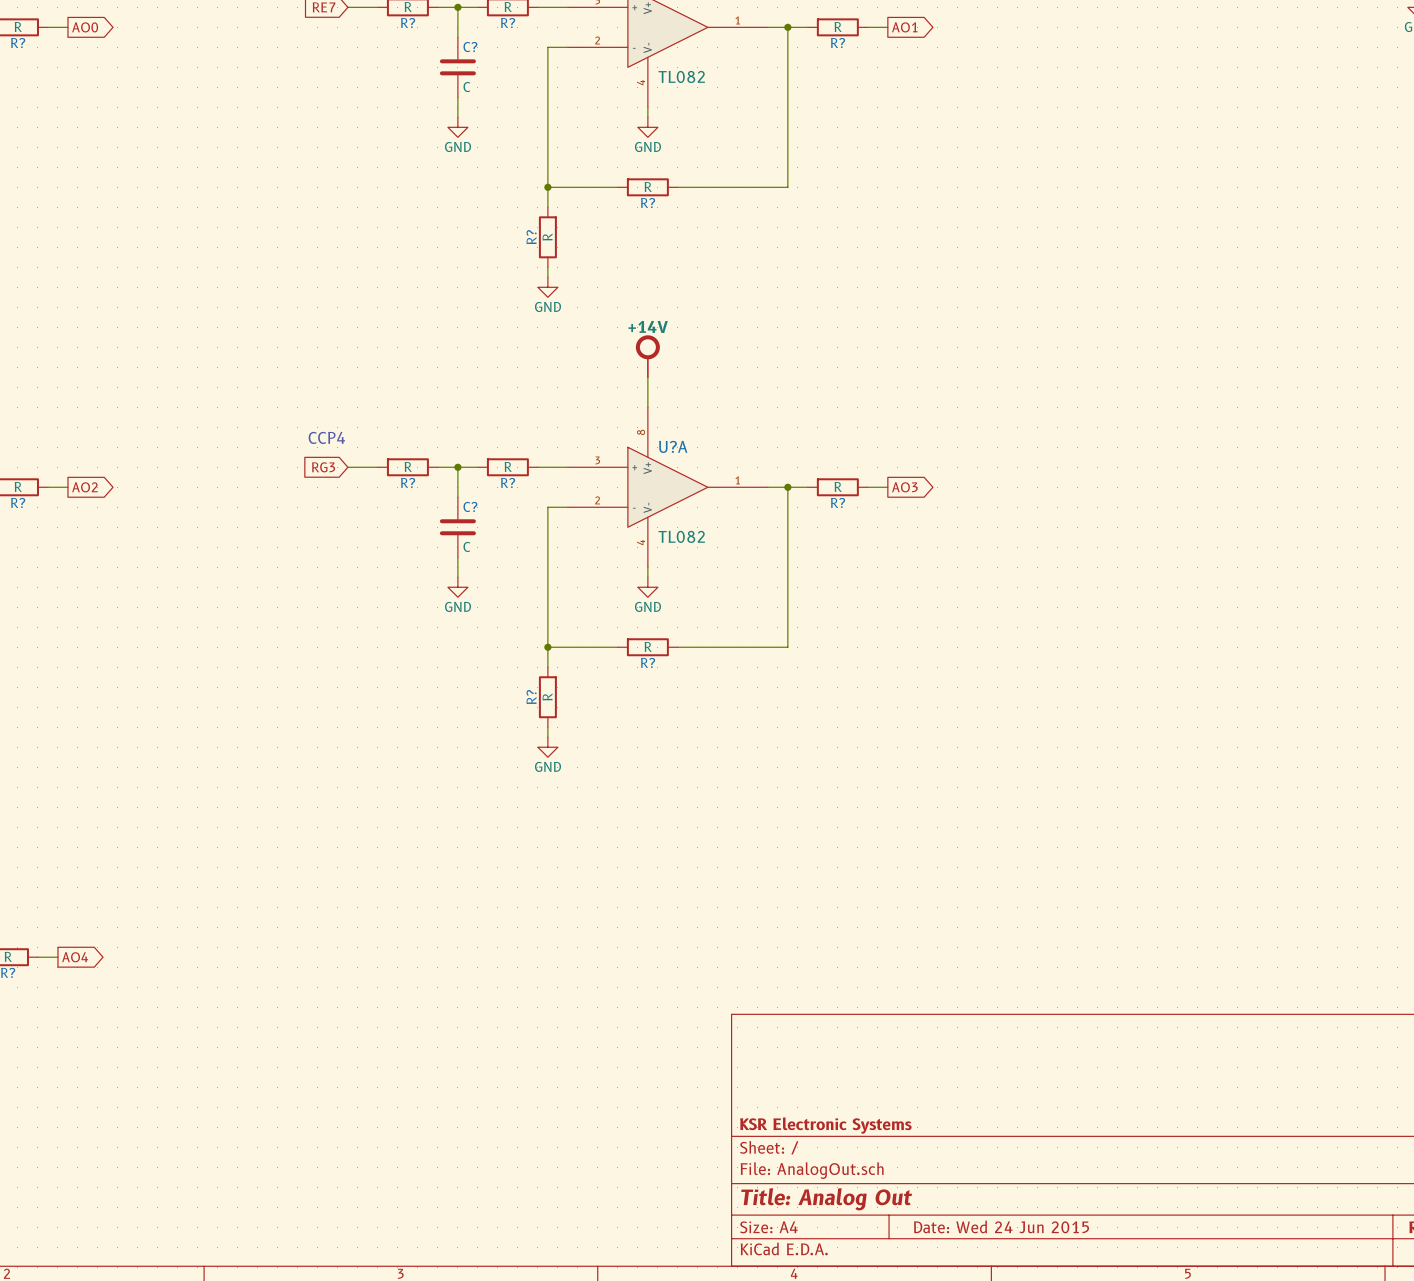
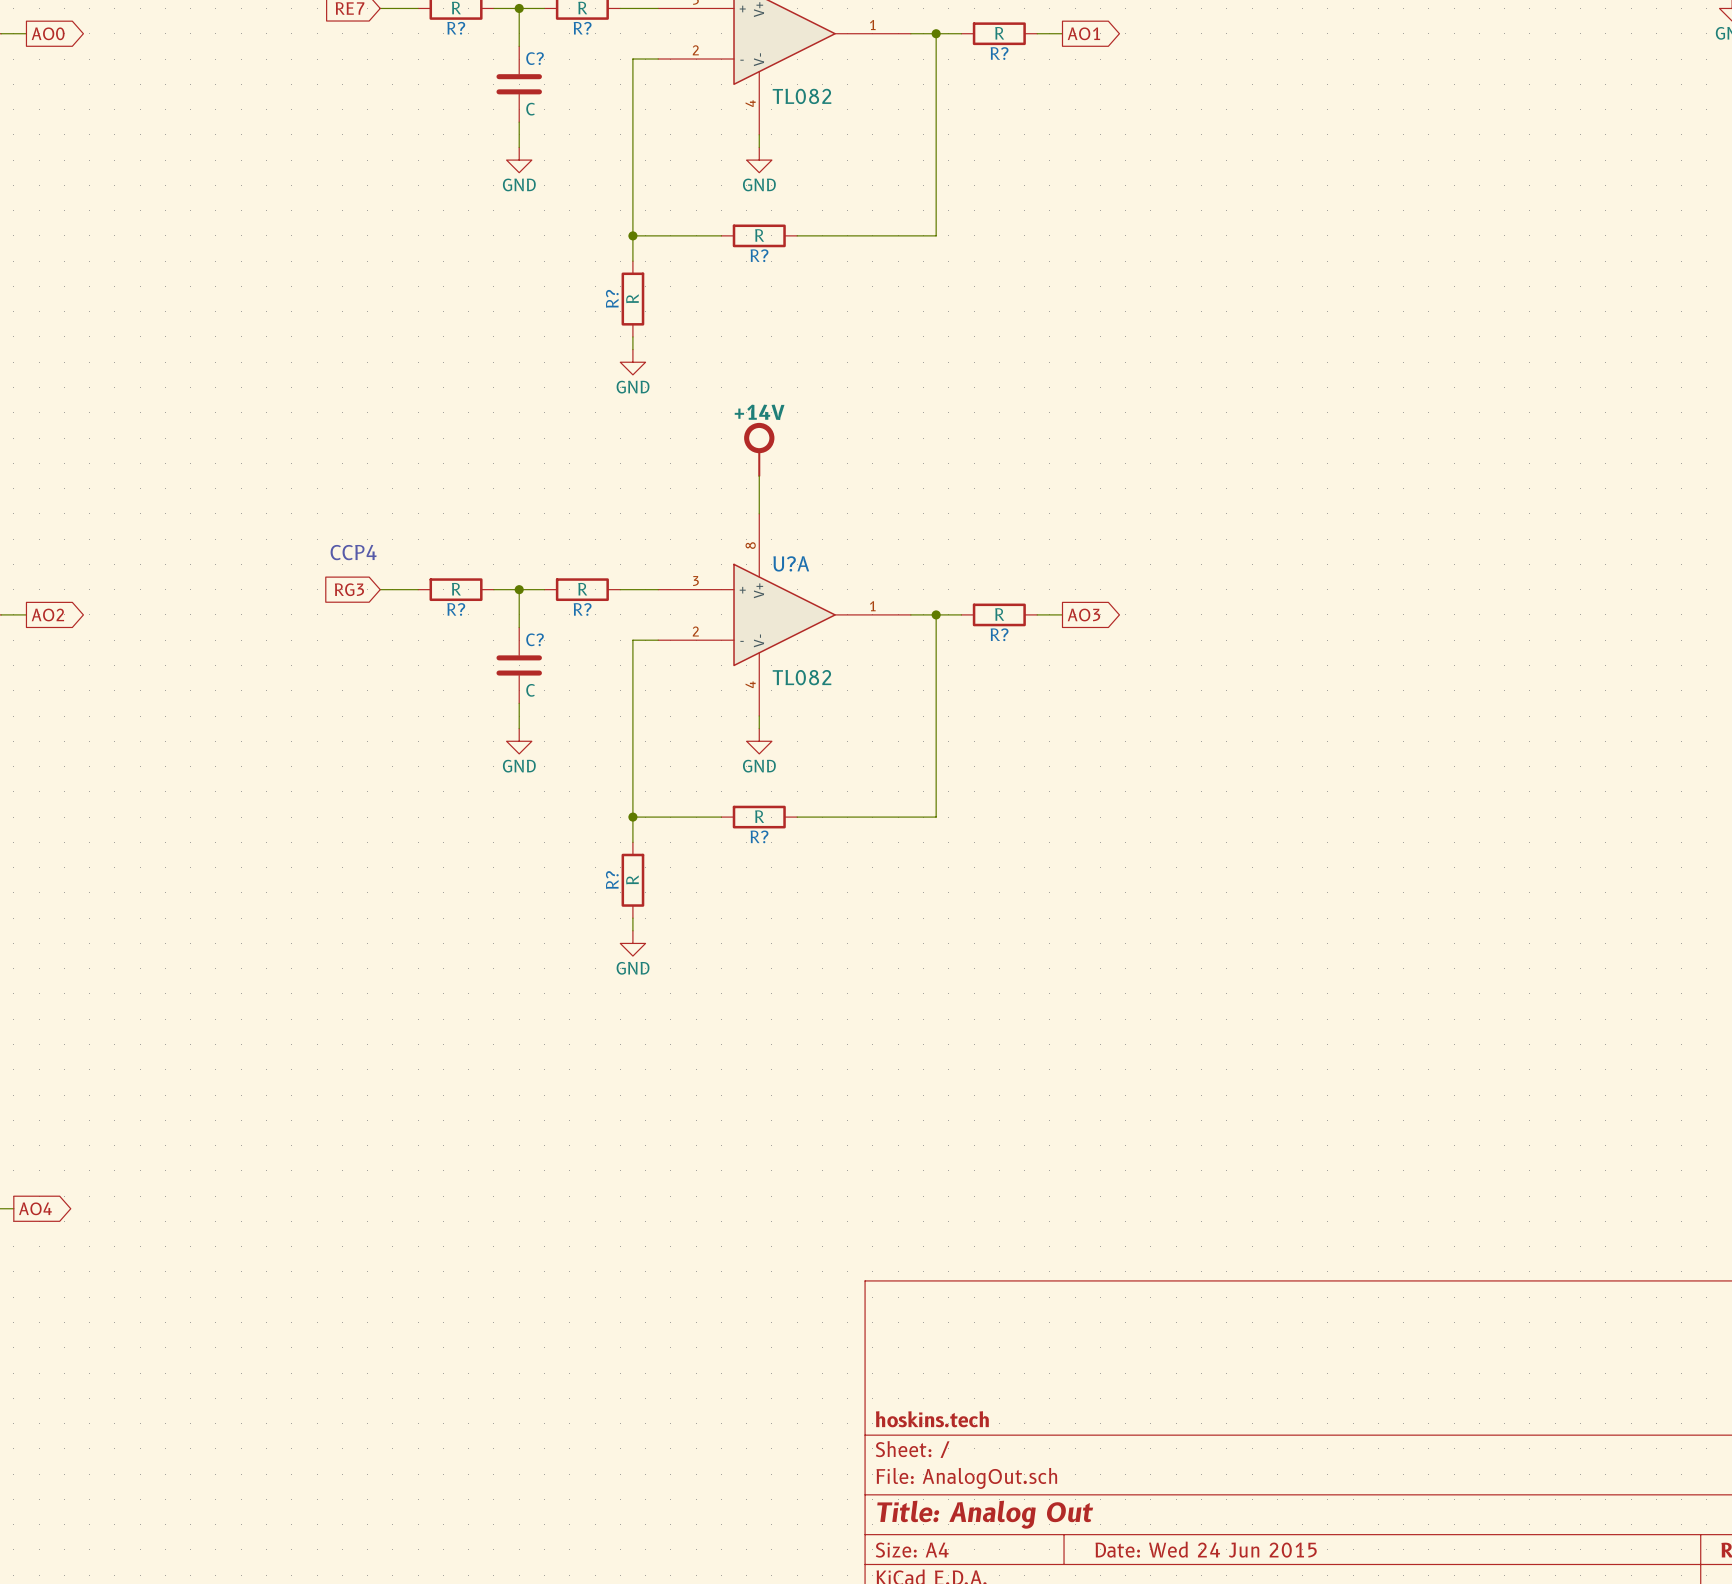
title block: KSR Electronic Systems (825, 1125) -> hoskins.tech (932, 1419)

